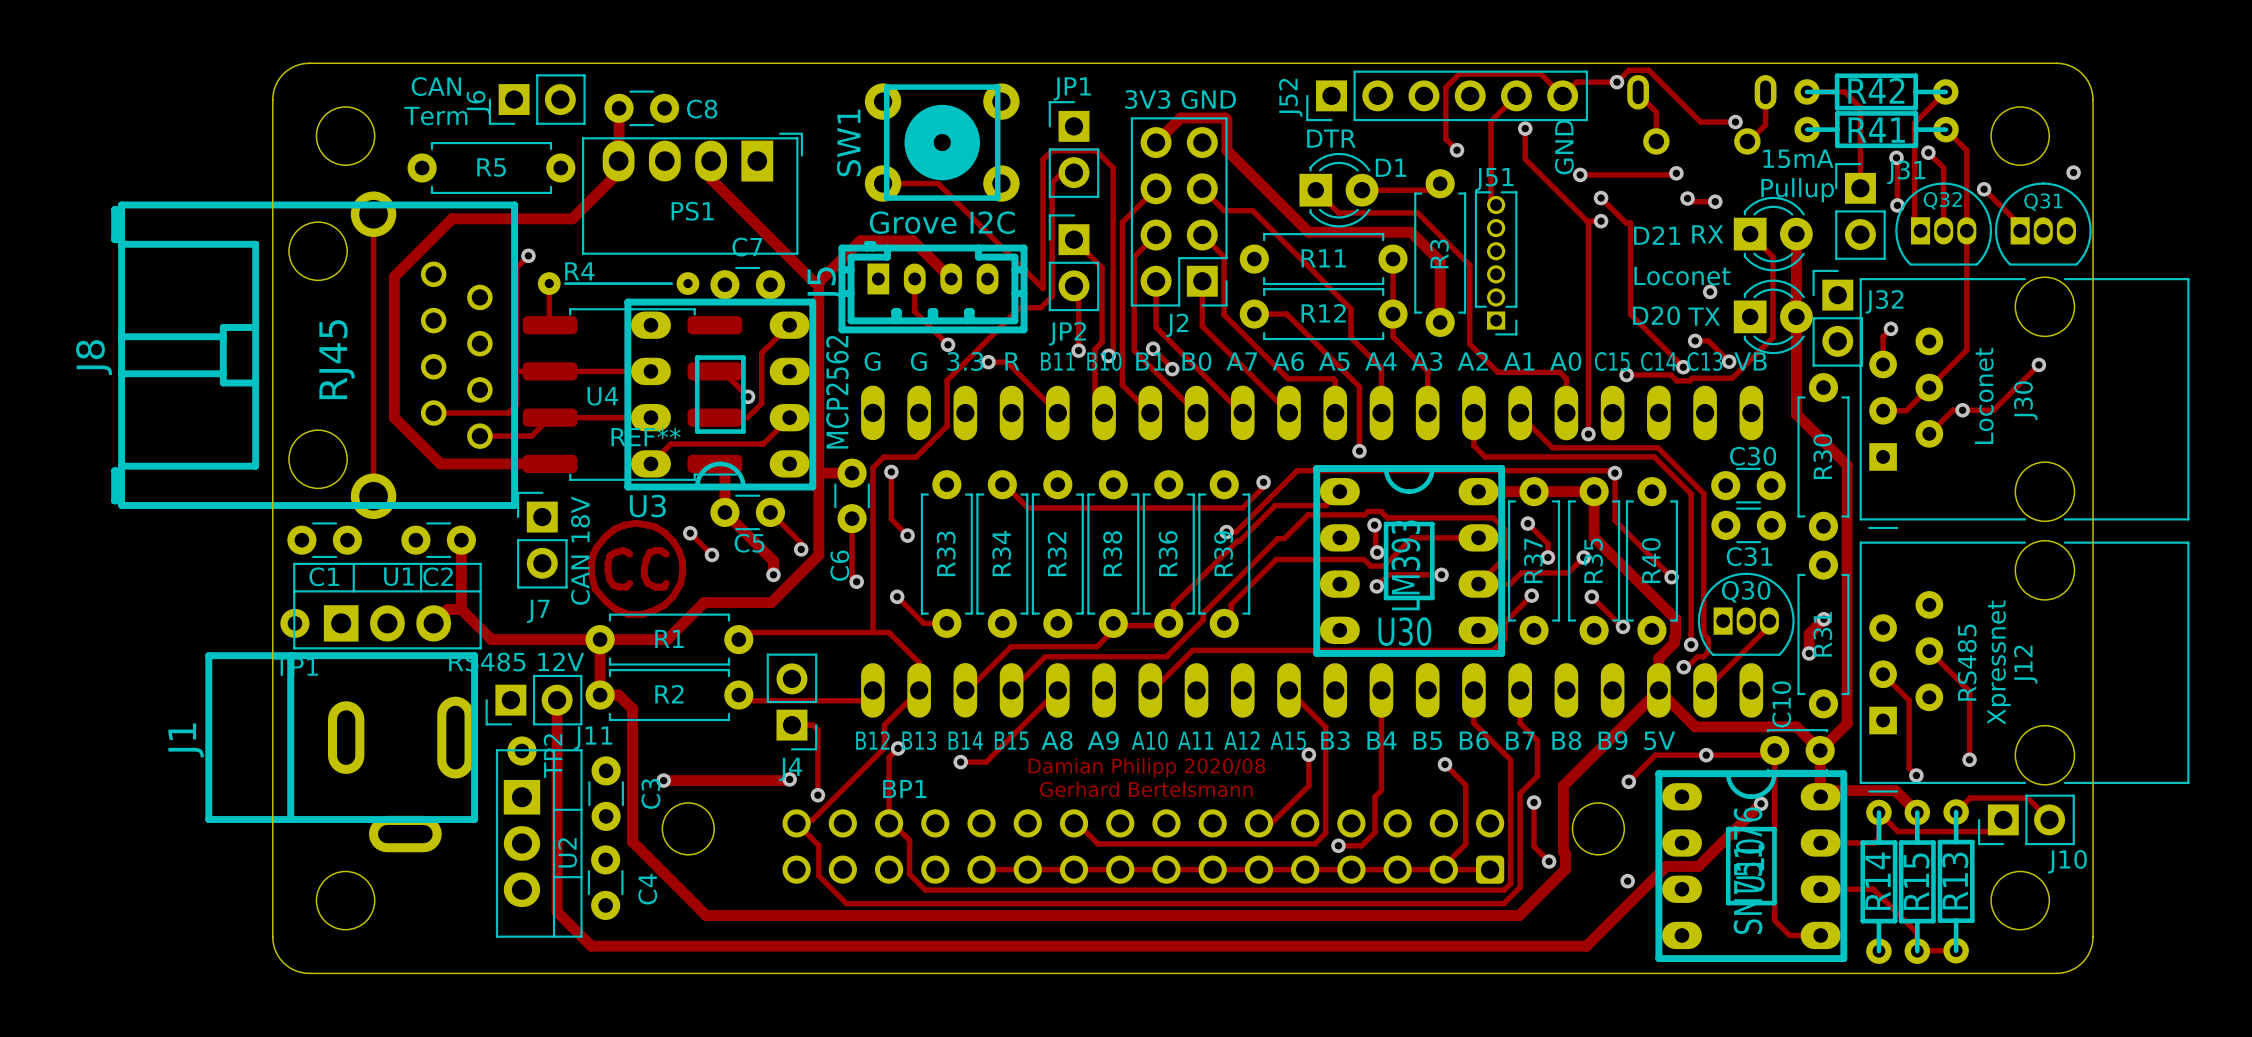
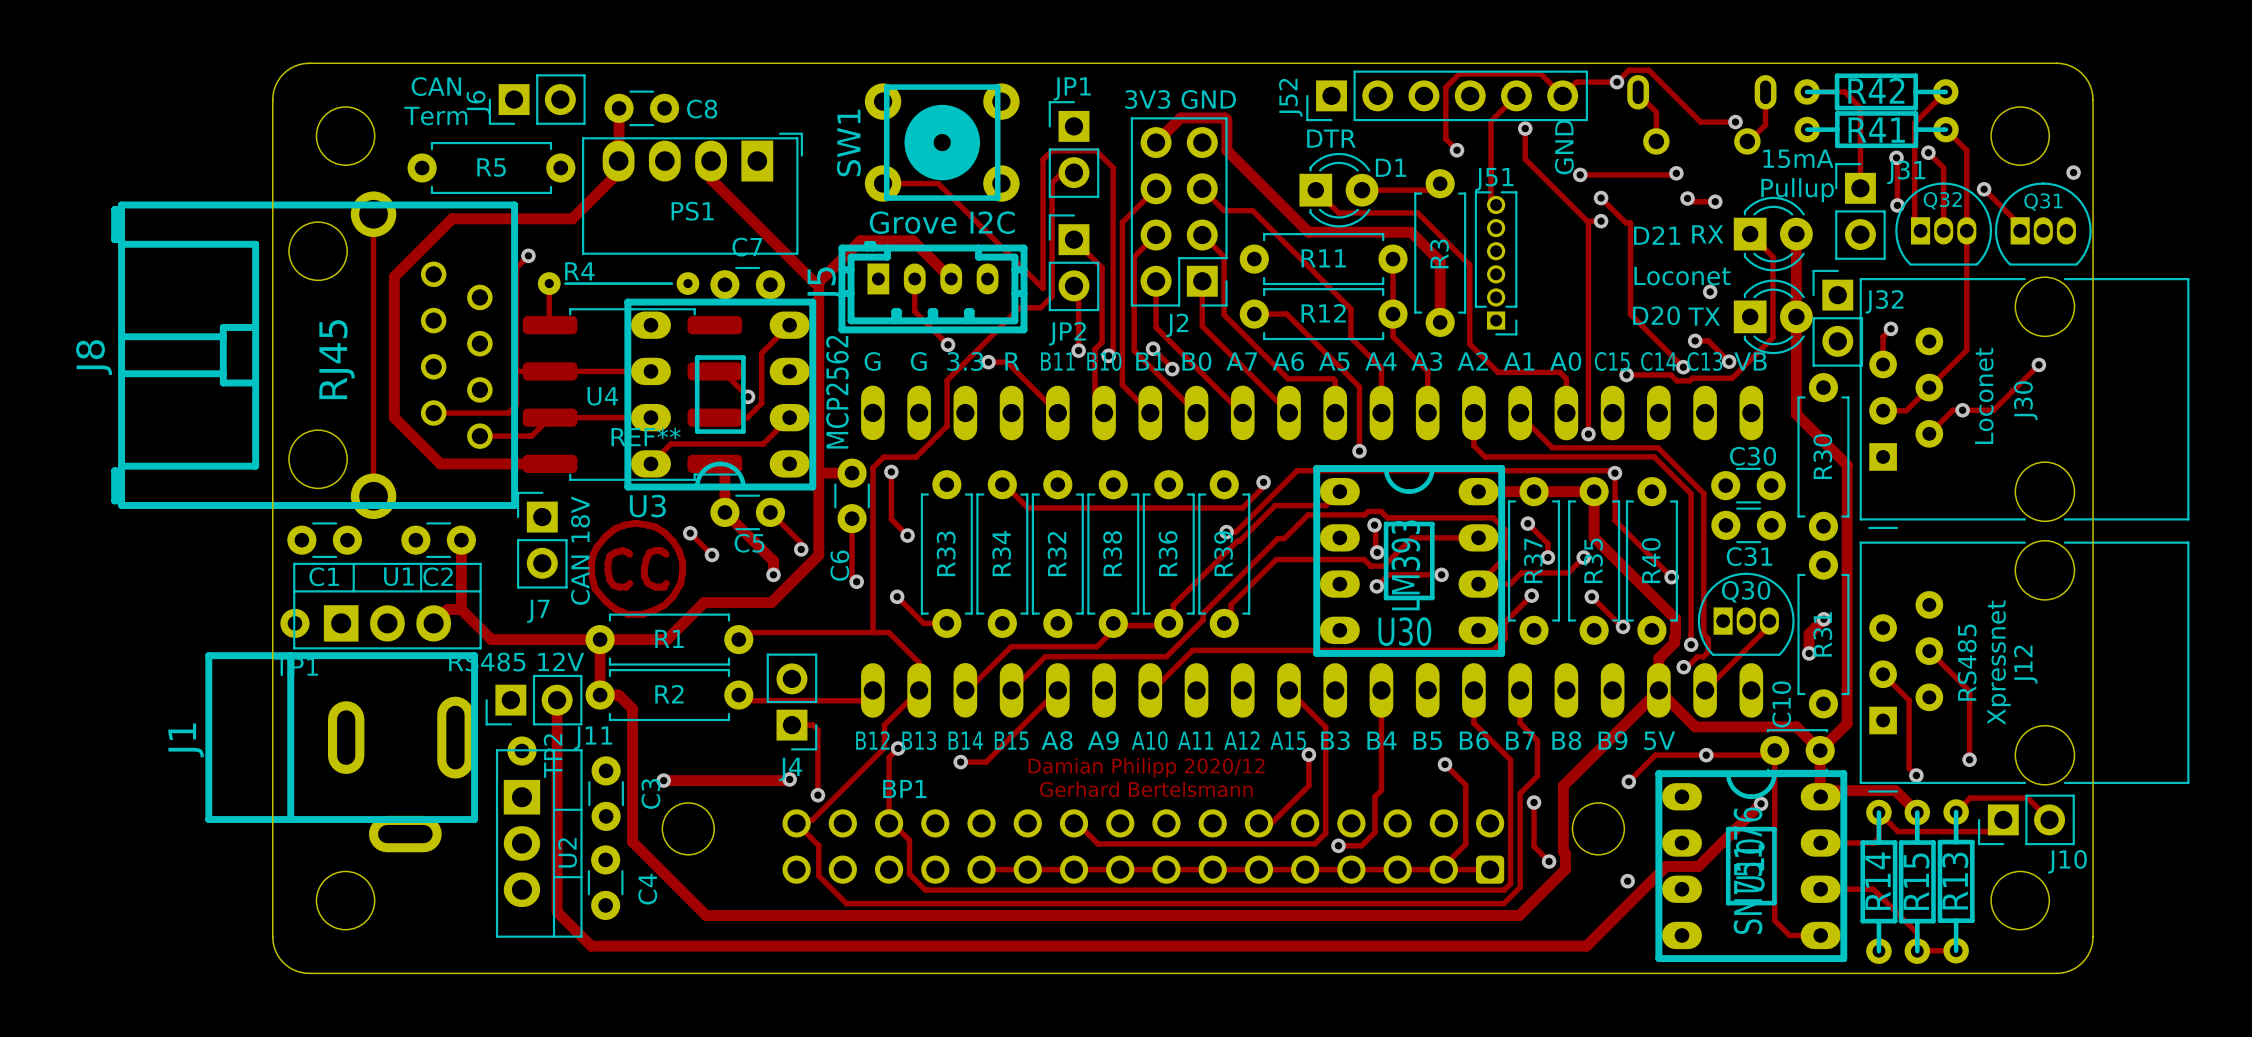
text: Damian Philipp 2020/08 (1146, 767) -> Damian Philipp 2020/12 (1146, 767)

